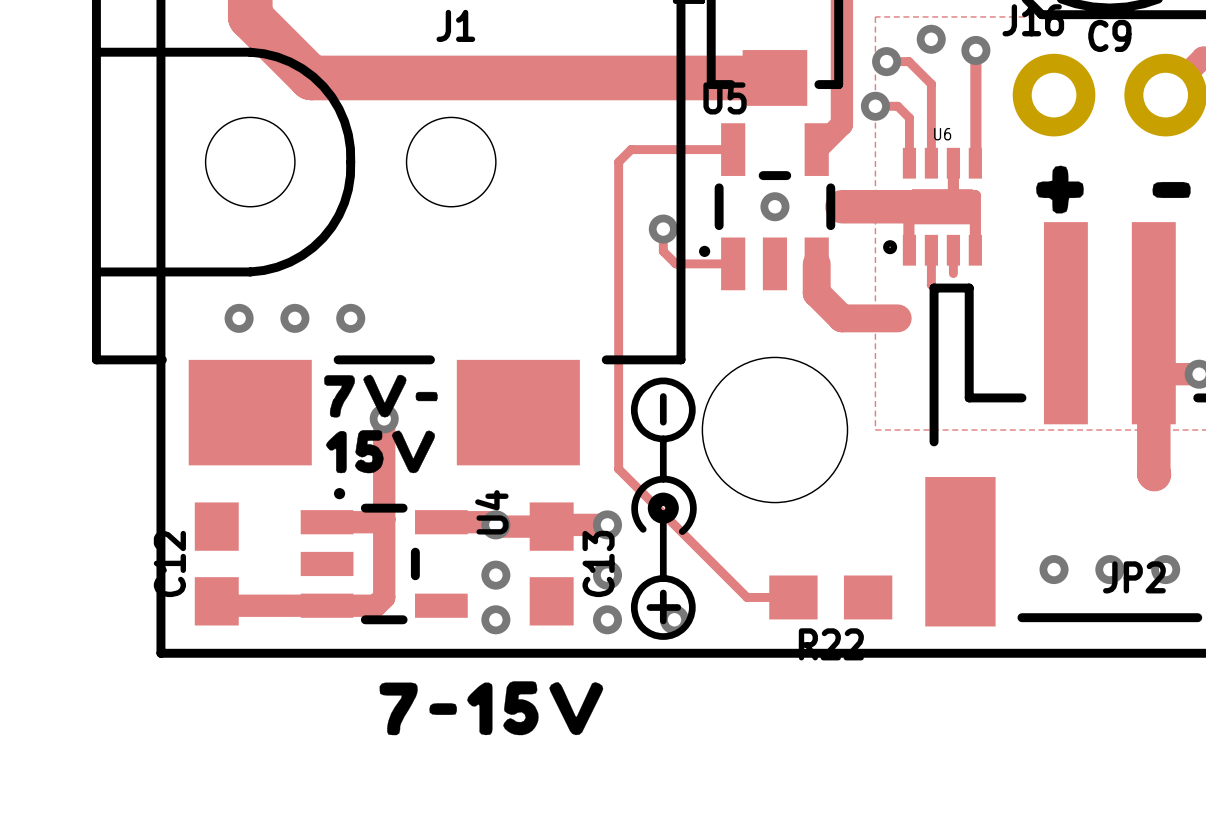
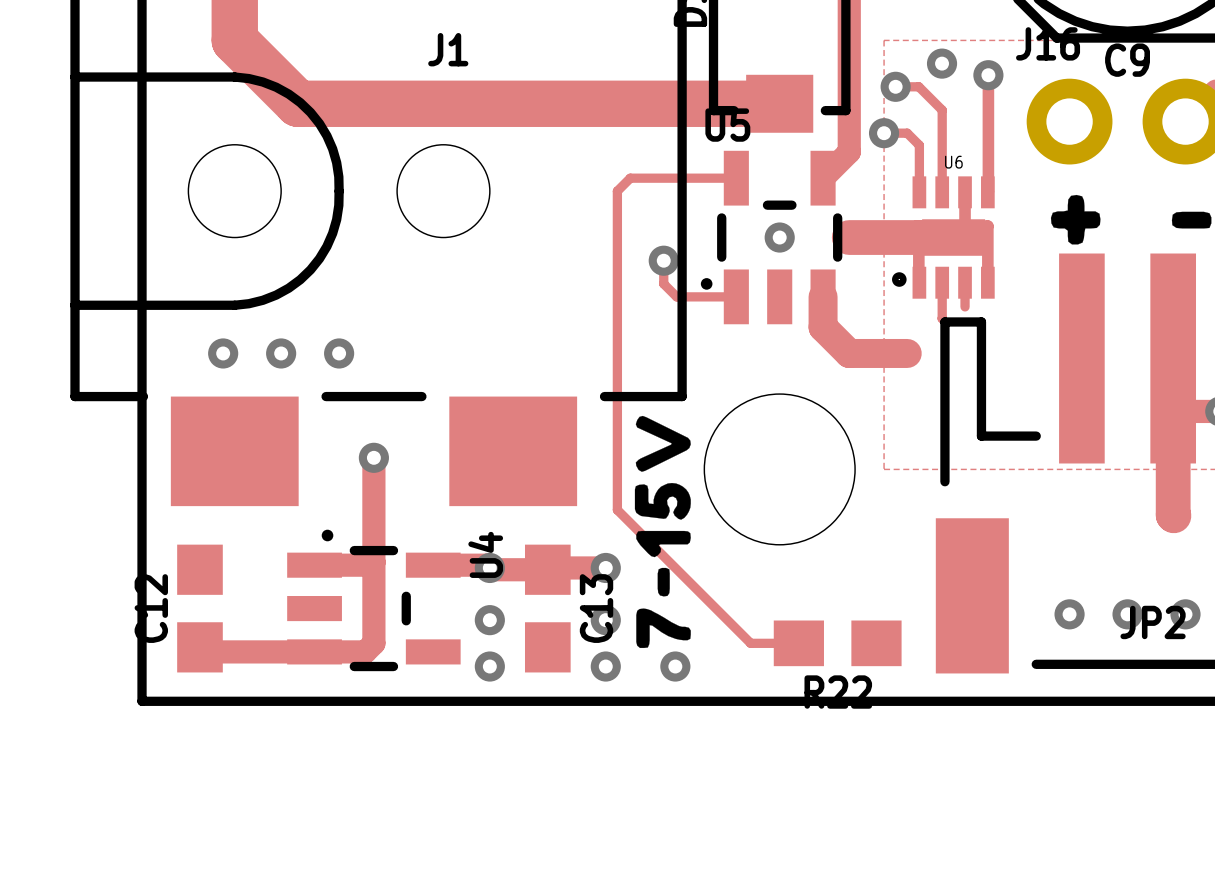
drawing: [324, 374, 438, 474] -> none
drawing shape: [630, 377, 697, 640] -> [634, 415, 691, 649]
drawing: [379, 681, 604, 736] -> none

